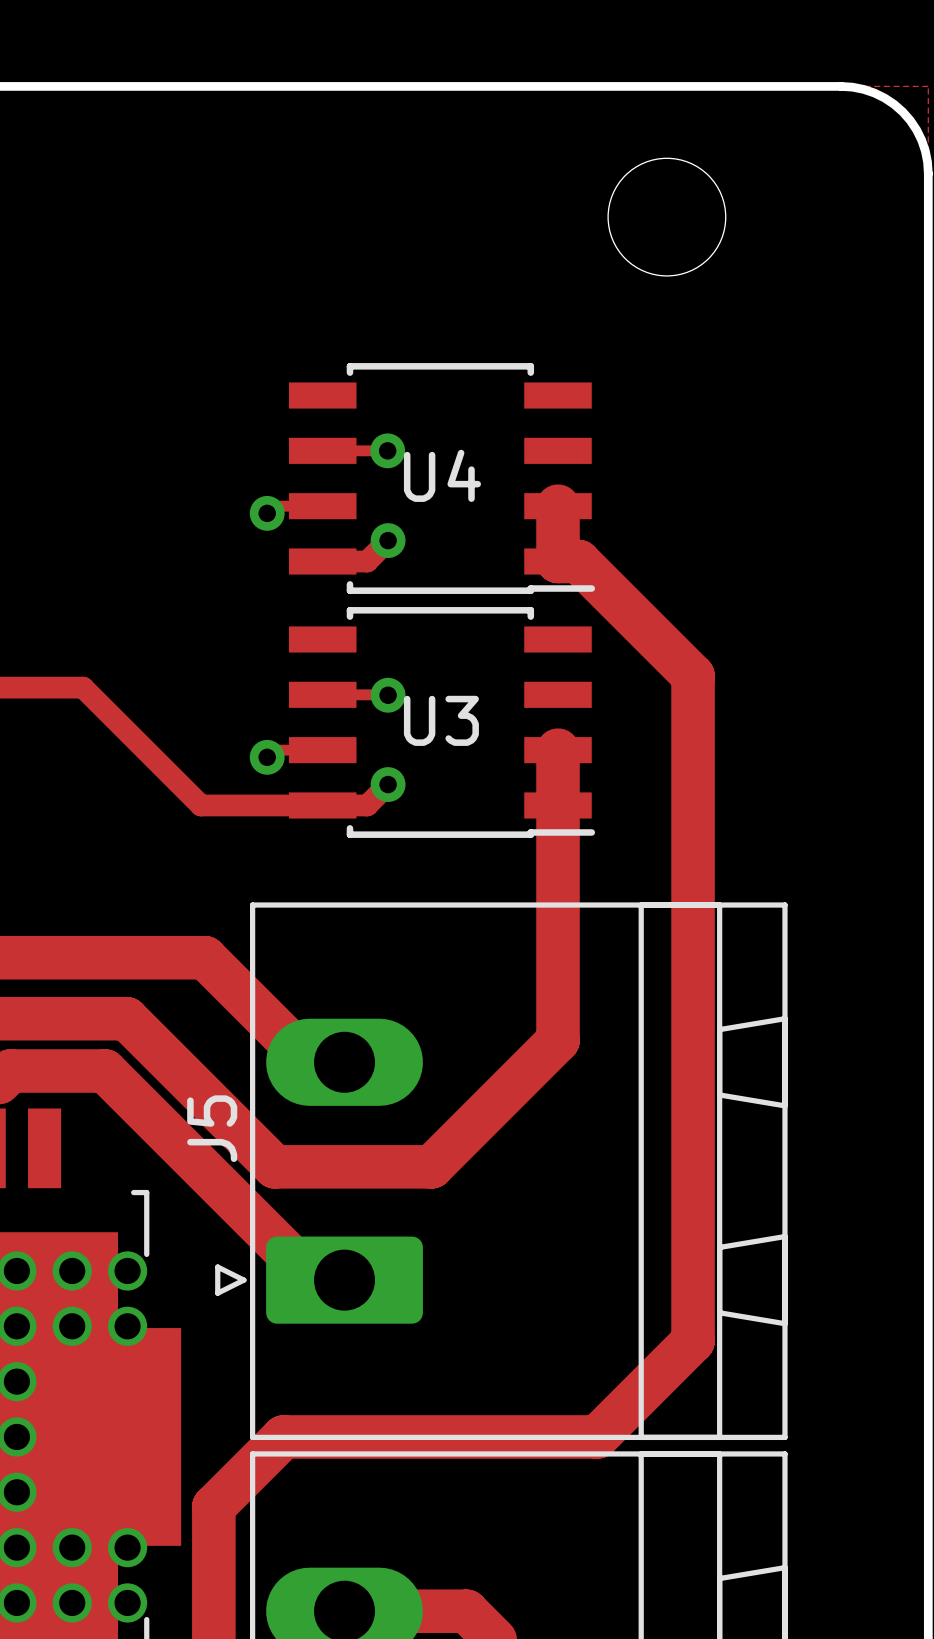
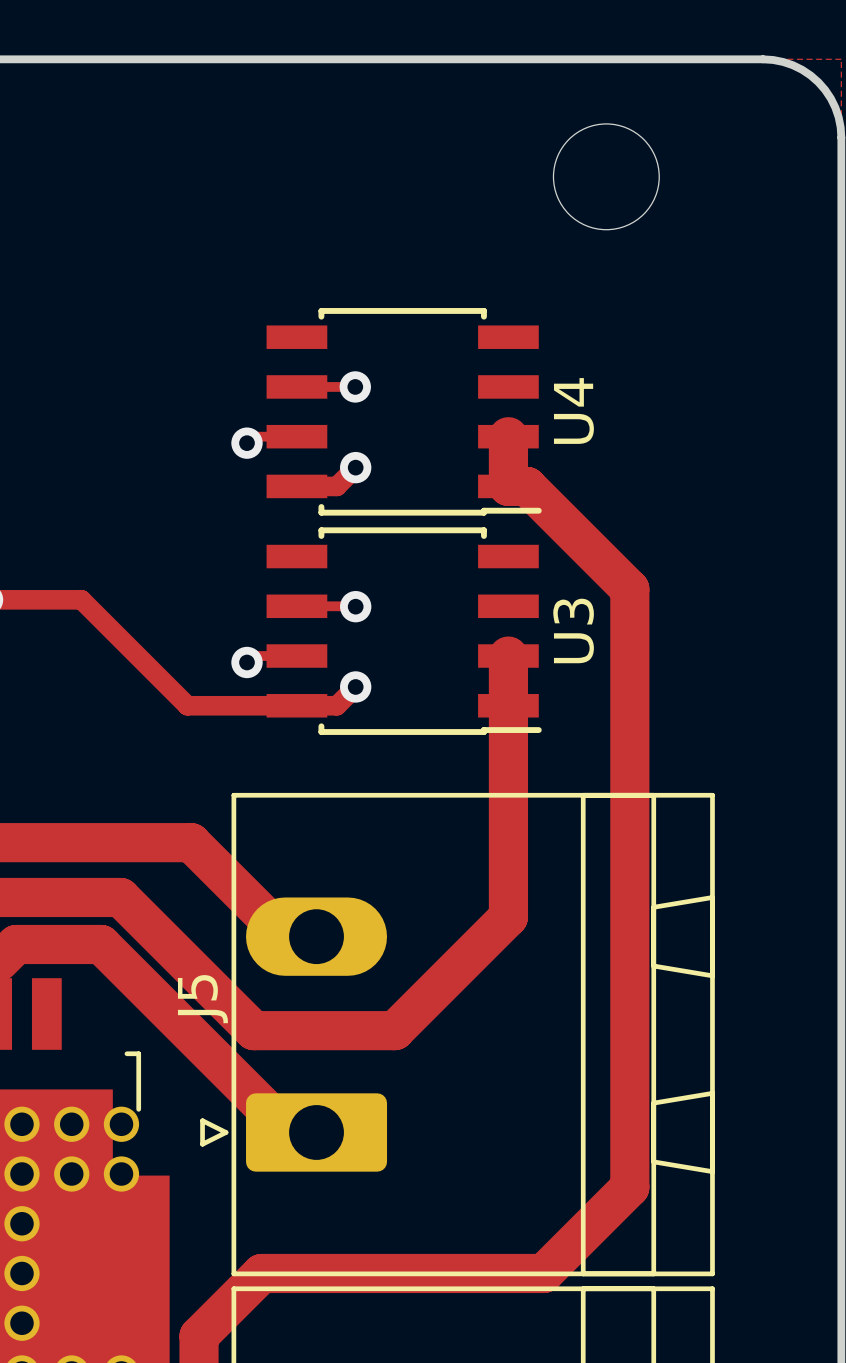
U4 name rotation: 0° (442, 475) -> 90° counterclockwise (573, 410)
U4 name position: U4 (442, 475) -> U4 (573, 410)
U3 name rotation: 0° (441, 720) -> 90° counterclockwise (573, 630)
U3 name position: U3 (441, 720) -> U3 (573, 630)

